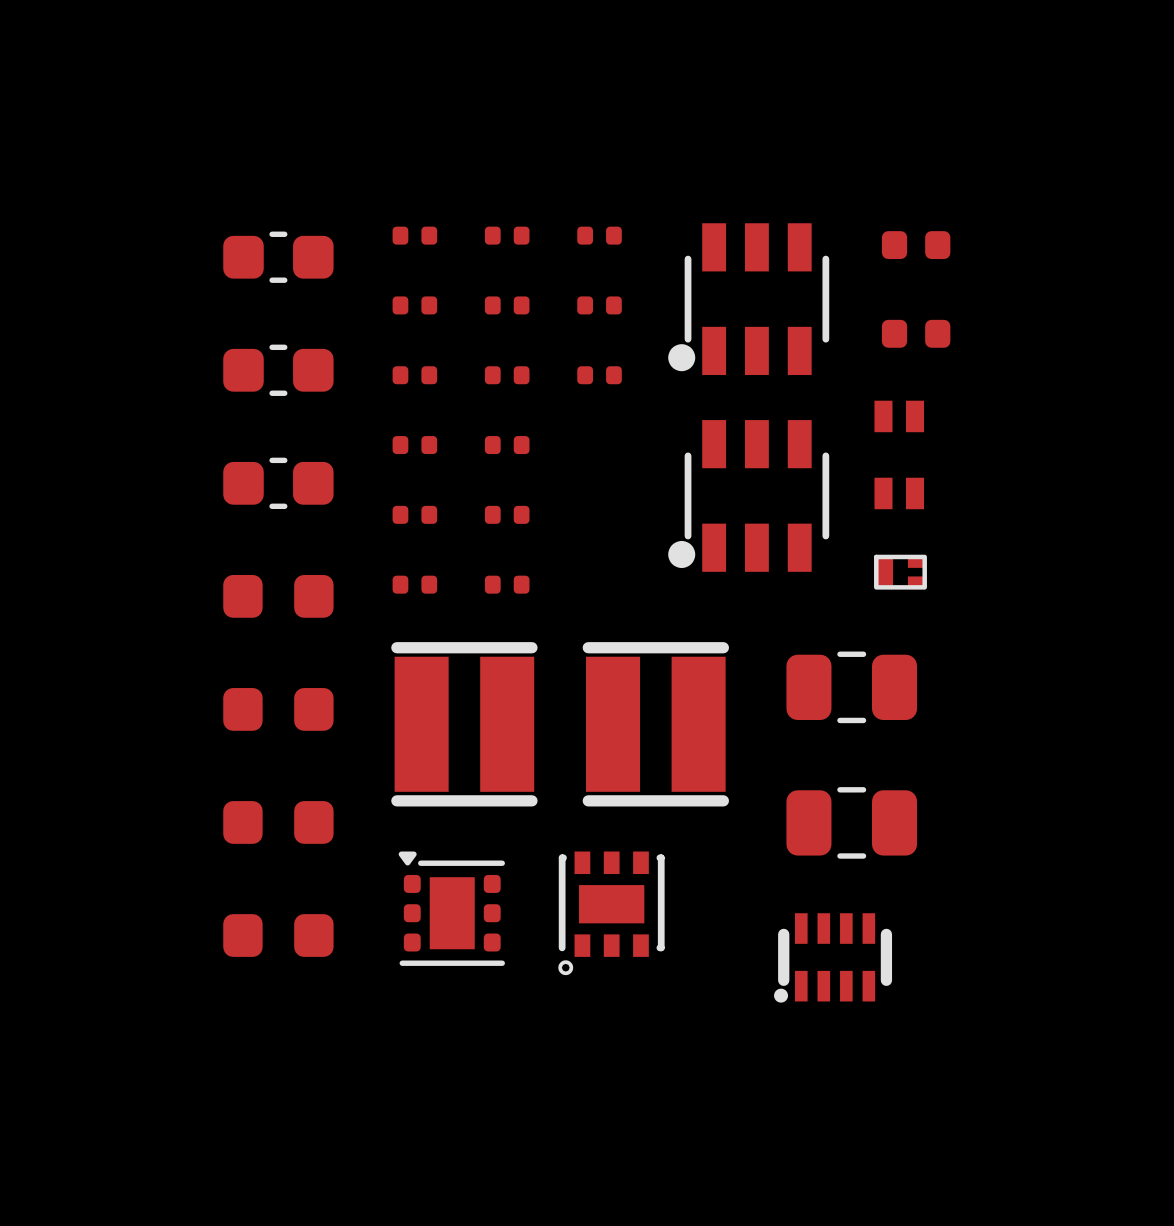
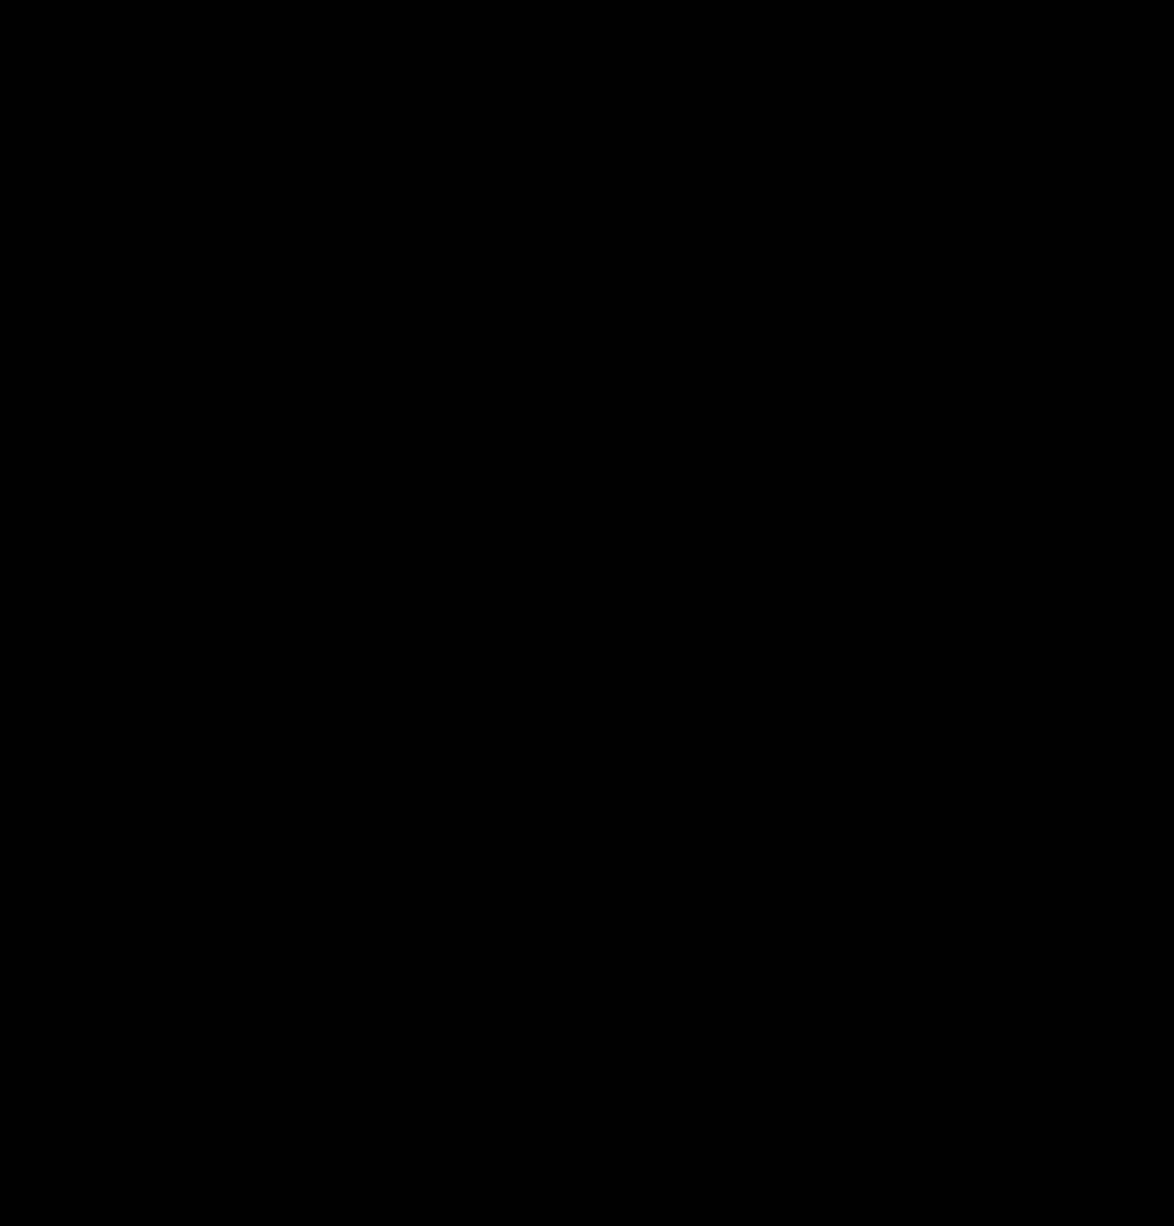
part: (414, 235) -> none
part: (507, 235) -> none
part: (599, 235) -> none
part: (916, 245) -> none
part: (278, 257) -> none
part: (748, 299) -> none
part: (414, 305) -> none
part: (507, 305) -> none
part: (599, 305) -> none
part: (916, 333) -> none
part: (278, 370) -> none
part: (414, 375) -> none
part: (507, 375) -> none
part: (599, 375) -> none
part: (899, 416) -> none
part: (414, 445) -> none
part: (507, 445) -> none
part: (278, 483) -> none
part: (899, 493) -> none
part: (748, 495) -> none
part: (414, 514) -> none
part: (507, 514) -> none
part: (900, 572) -> none
part: (414, 584) -> none
part: (507, 584) -> none
part: (278, 596) -> none
part: (851, 687) -> none
part: (278, 709) -> none
part: (464, 724) -> none
part: (655, 724) -> none
part: (278, 822) -> none
part: (851, 822) -> none
part: (451, 908) -> none
part: (611, 913) -> none
part: (278, 935) -> none
part: (833, 957) -> none

